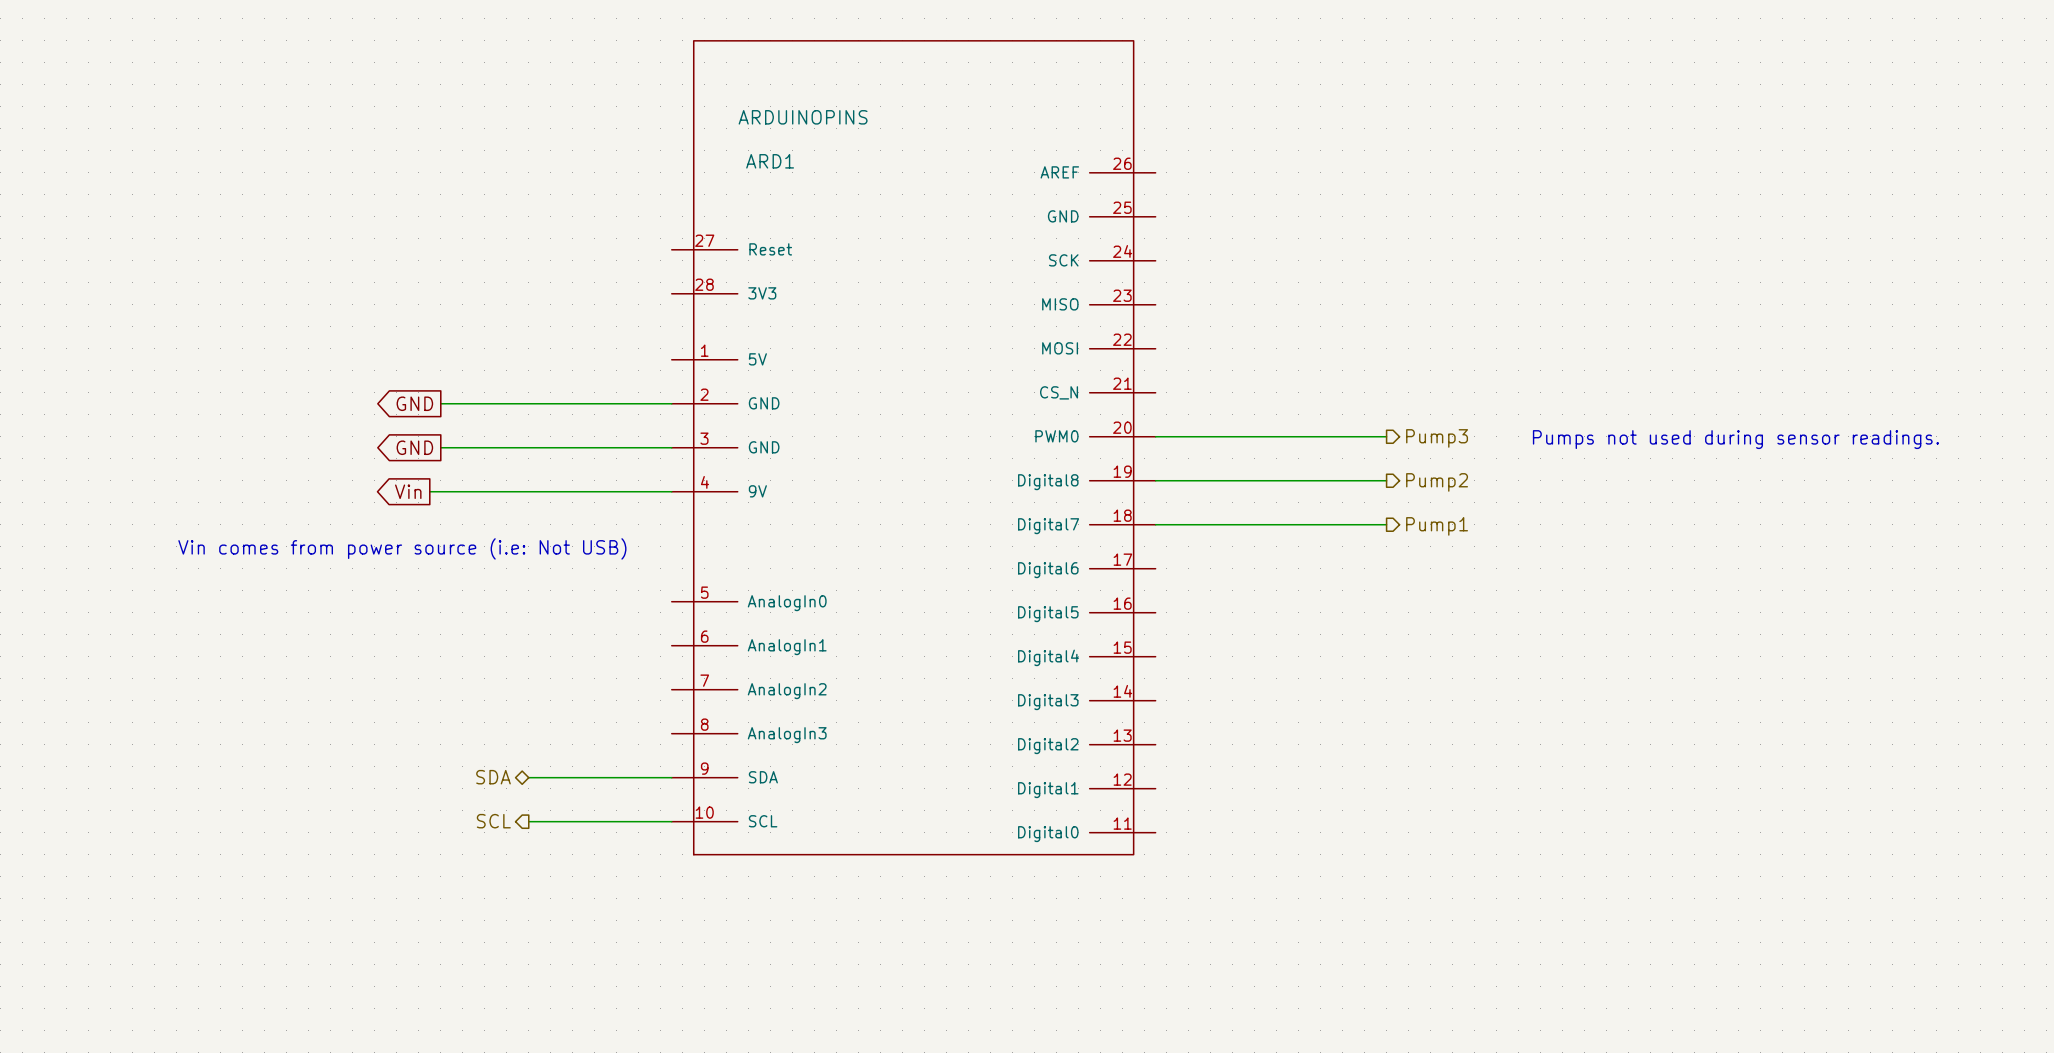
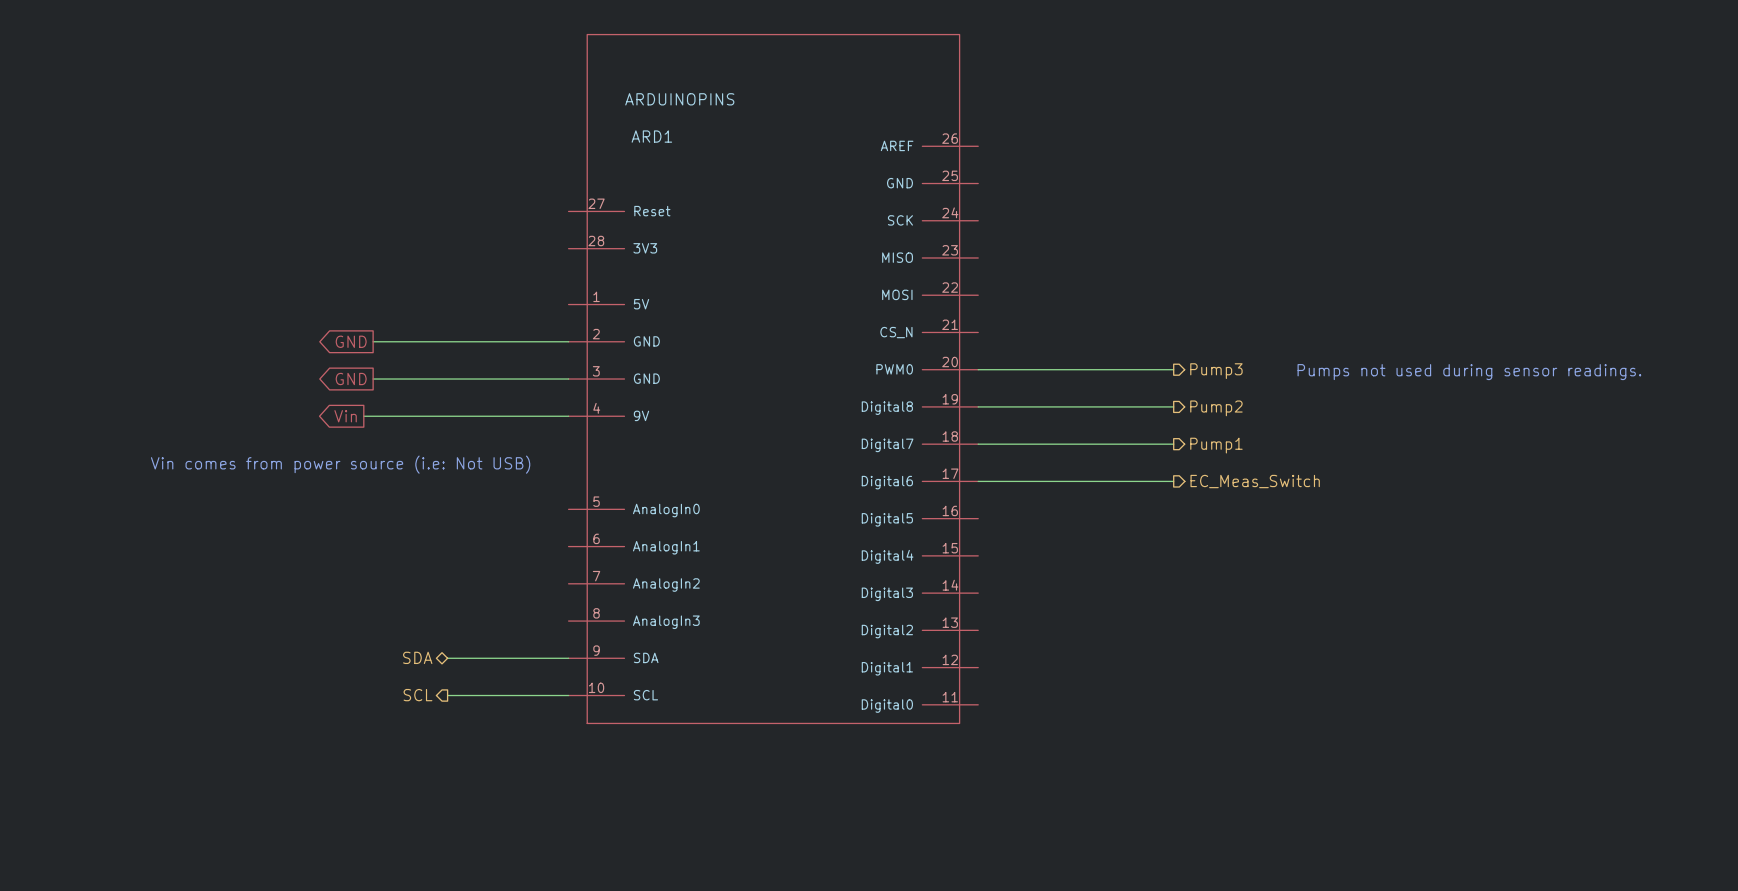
wire: none -> (978, 481) (1173, 481)
hierarchical label: none -> EC_Meas_Switch (1255, 481)

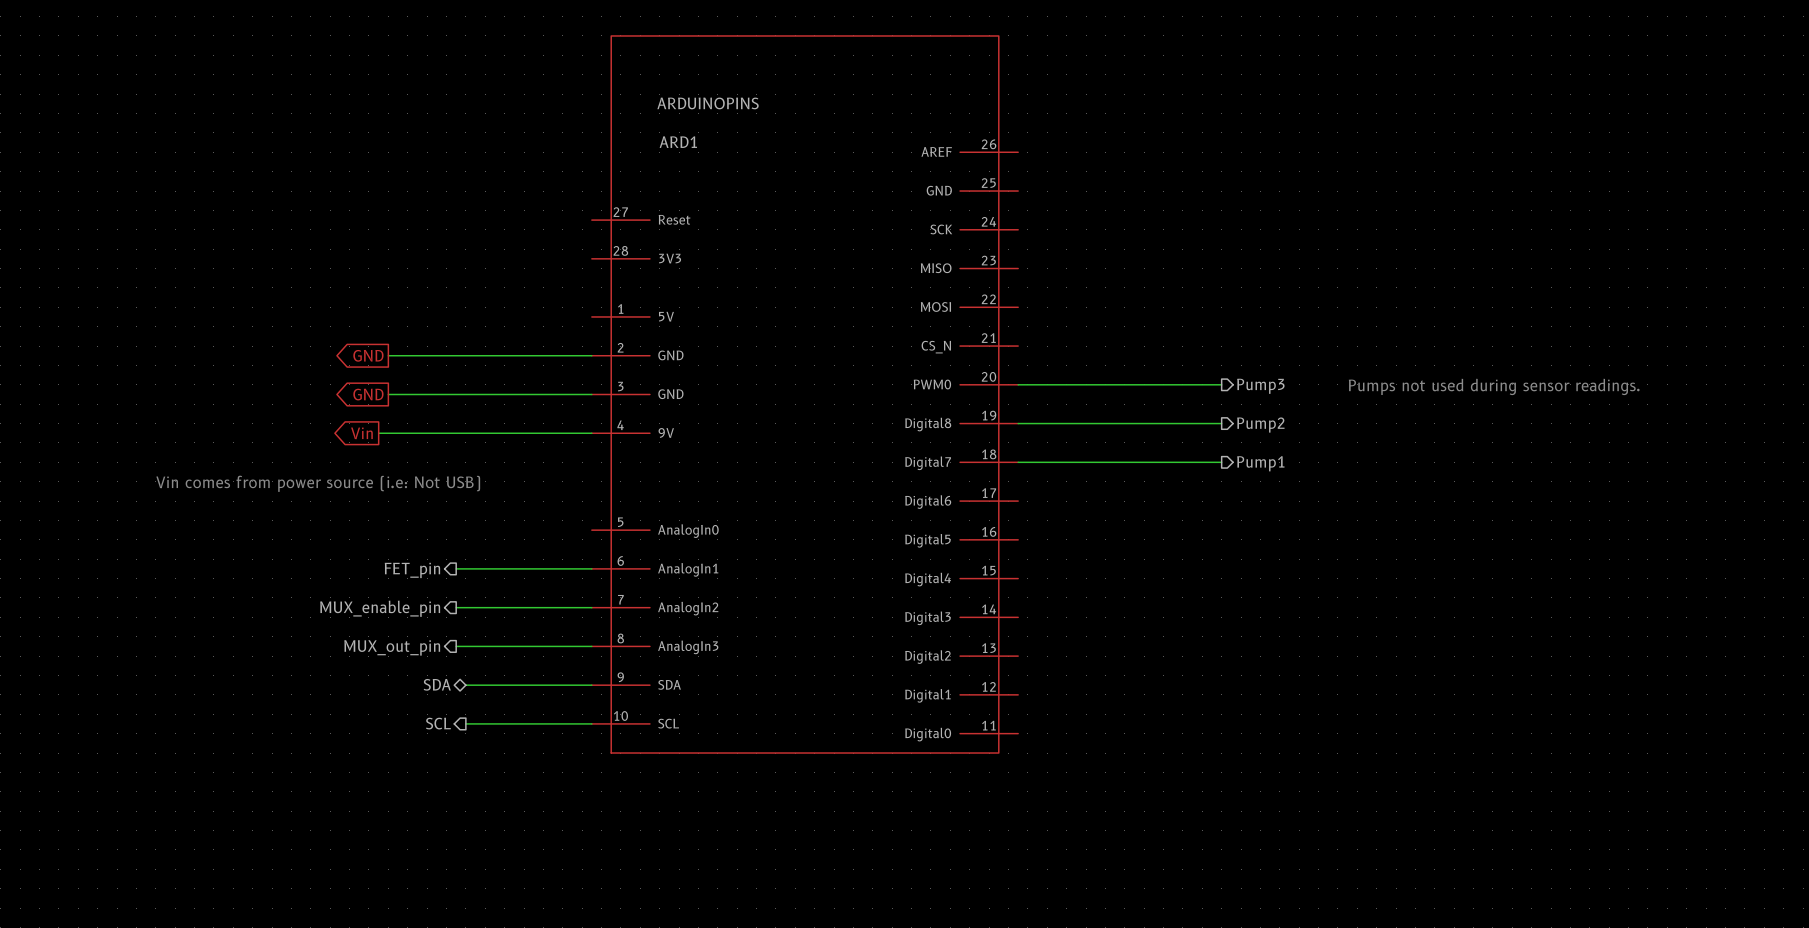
wire: (978, 481) (1173, 481) -> none
hierarchical label: EC_Meas_Switch (1255, 481) -> none
wire: none -> (456, 568) (591, 568)
hierarchical label: none -> FET_pin (412, 570)
wire: none -> (456, 607) (591, 607)
hierarchical label: none -> MUX_enable_pin (380, 608)
wire: none -> (456, 646) (591, 646)
hierarchical label: none -> MUX_out_pin (392, 647)

